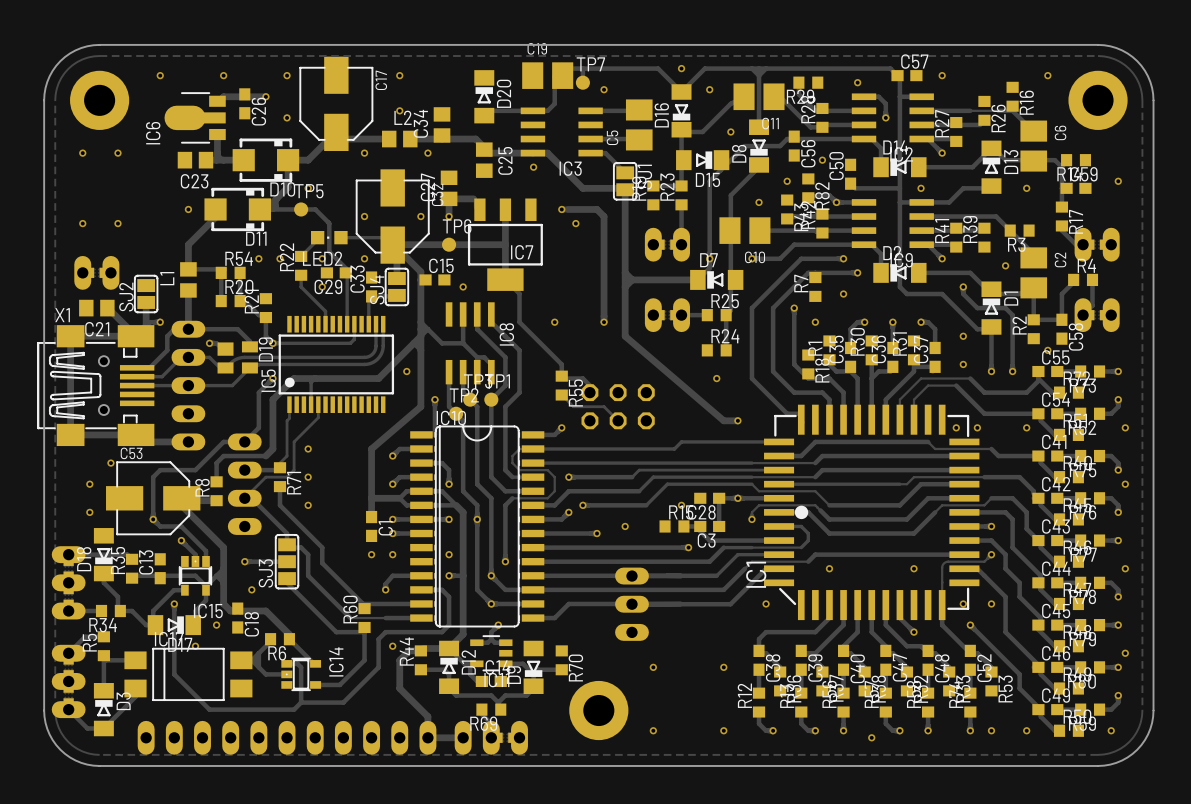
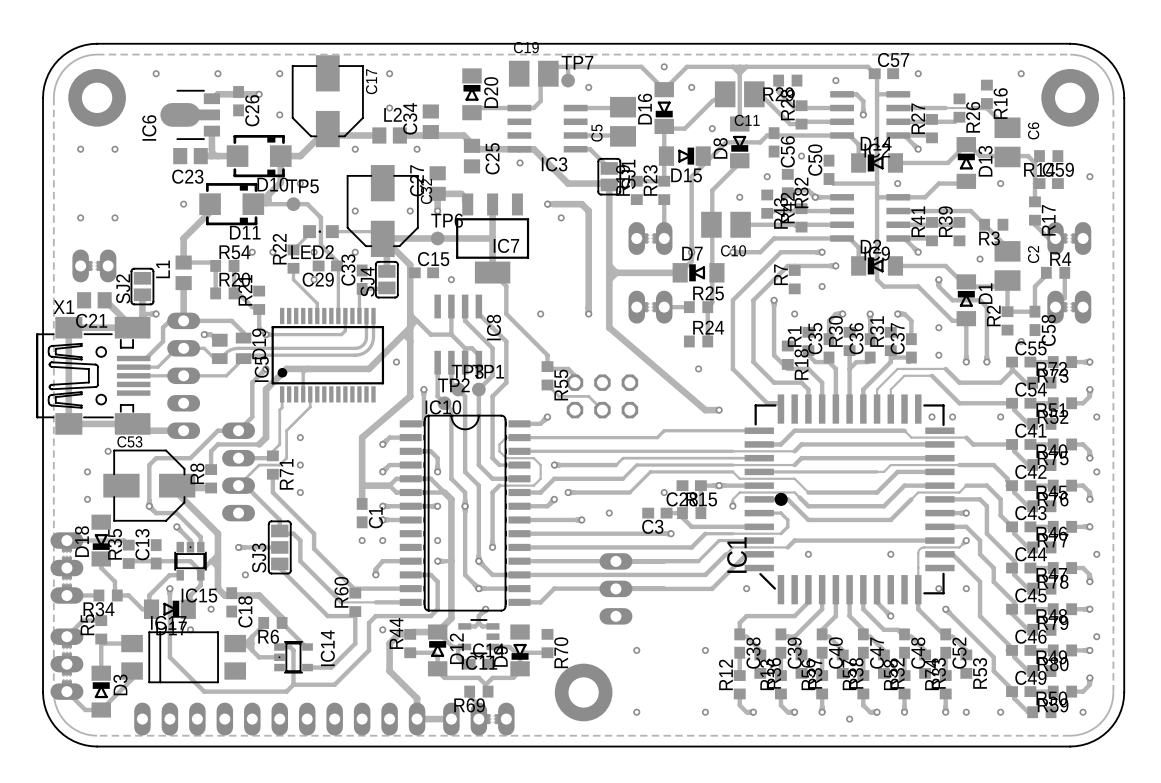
R15 position: (674, 526) -> (691, 513)
C3 position: (709, 526) -> (657, 513)

